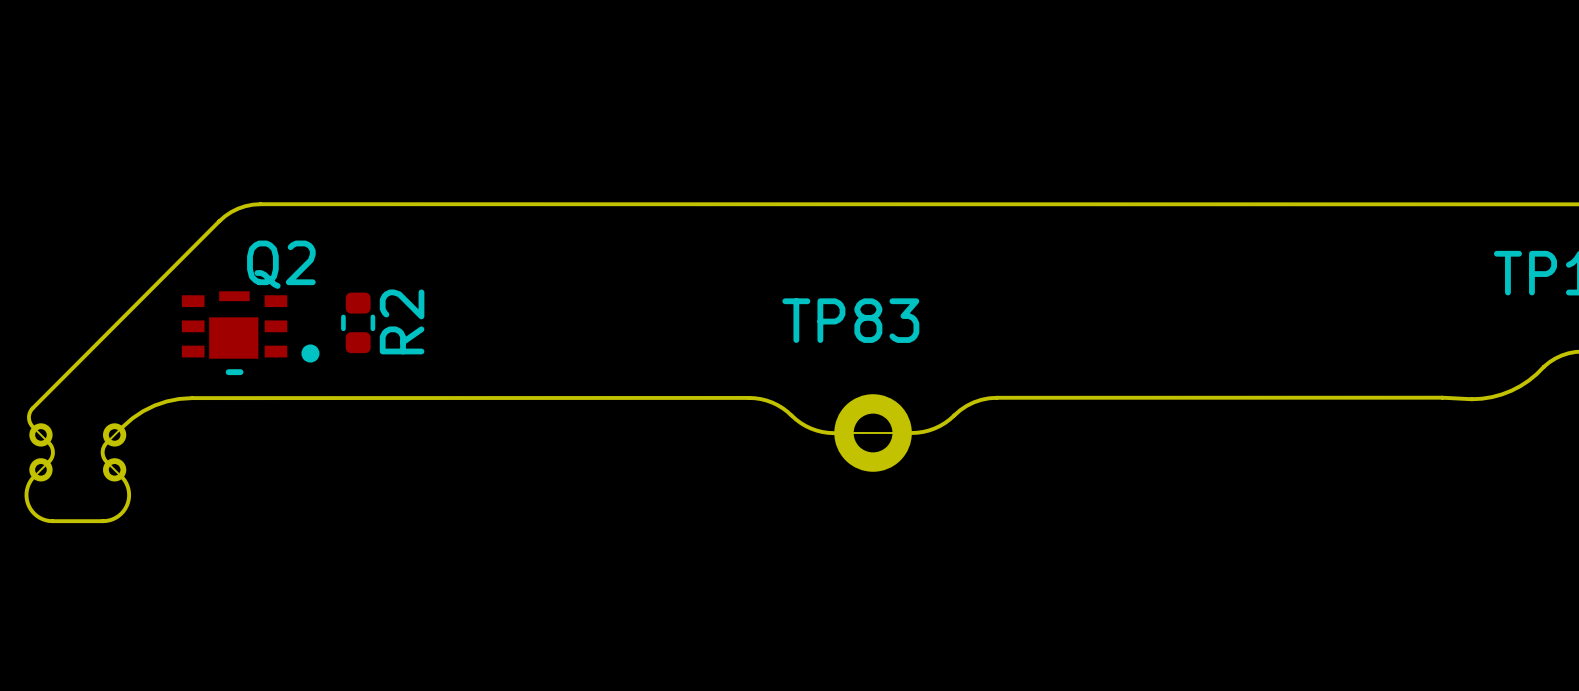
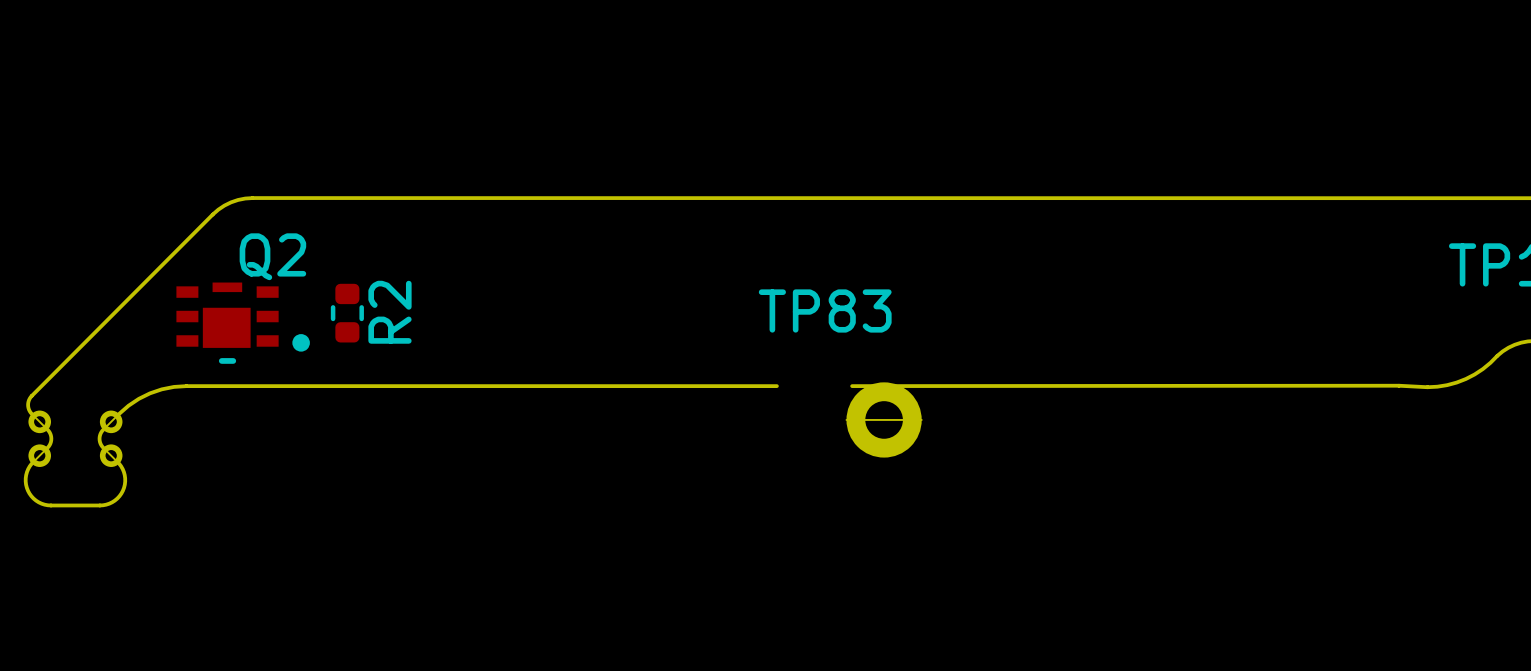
board edge: (1442, 397) (989, 398) (966, 405) (934, 428) (911, 432) -> (1398, 385) (852, 386)
board edge: (192, 398) (755, 398) (777, 405) (811, 428) (834, 433) -> (186, 386) (776, 386)
part position: (873, 432) -> (884, 419)

